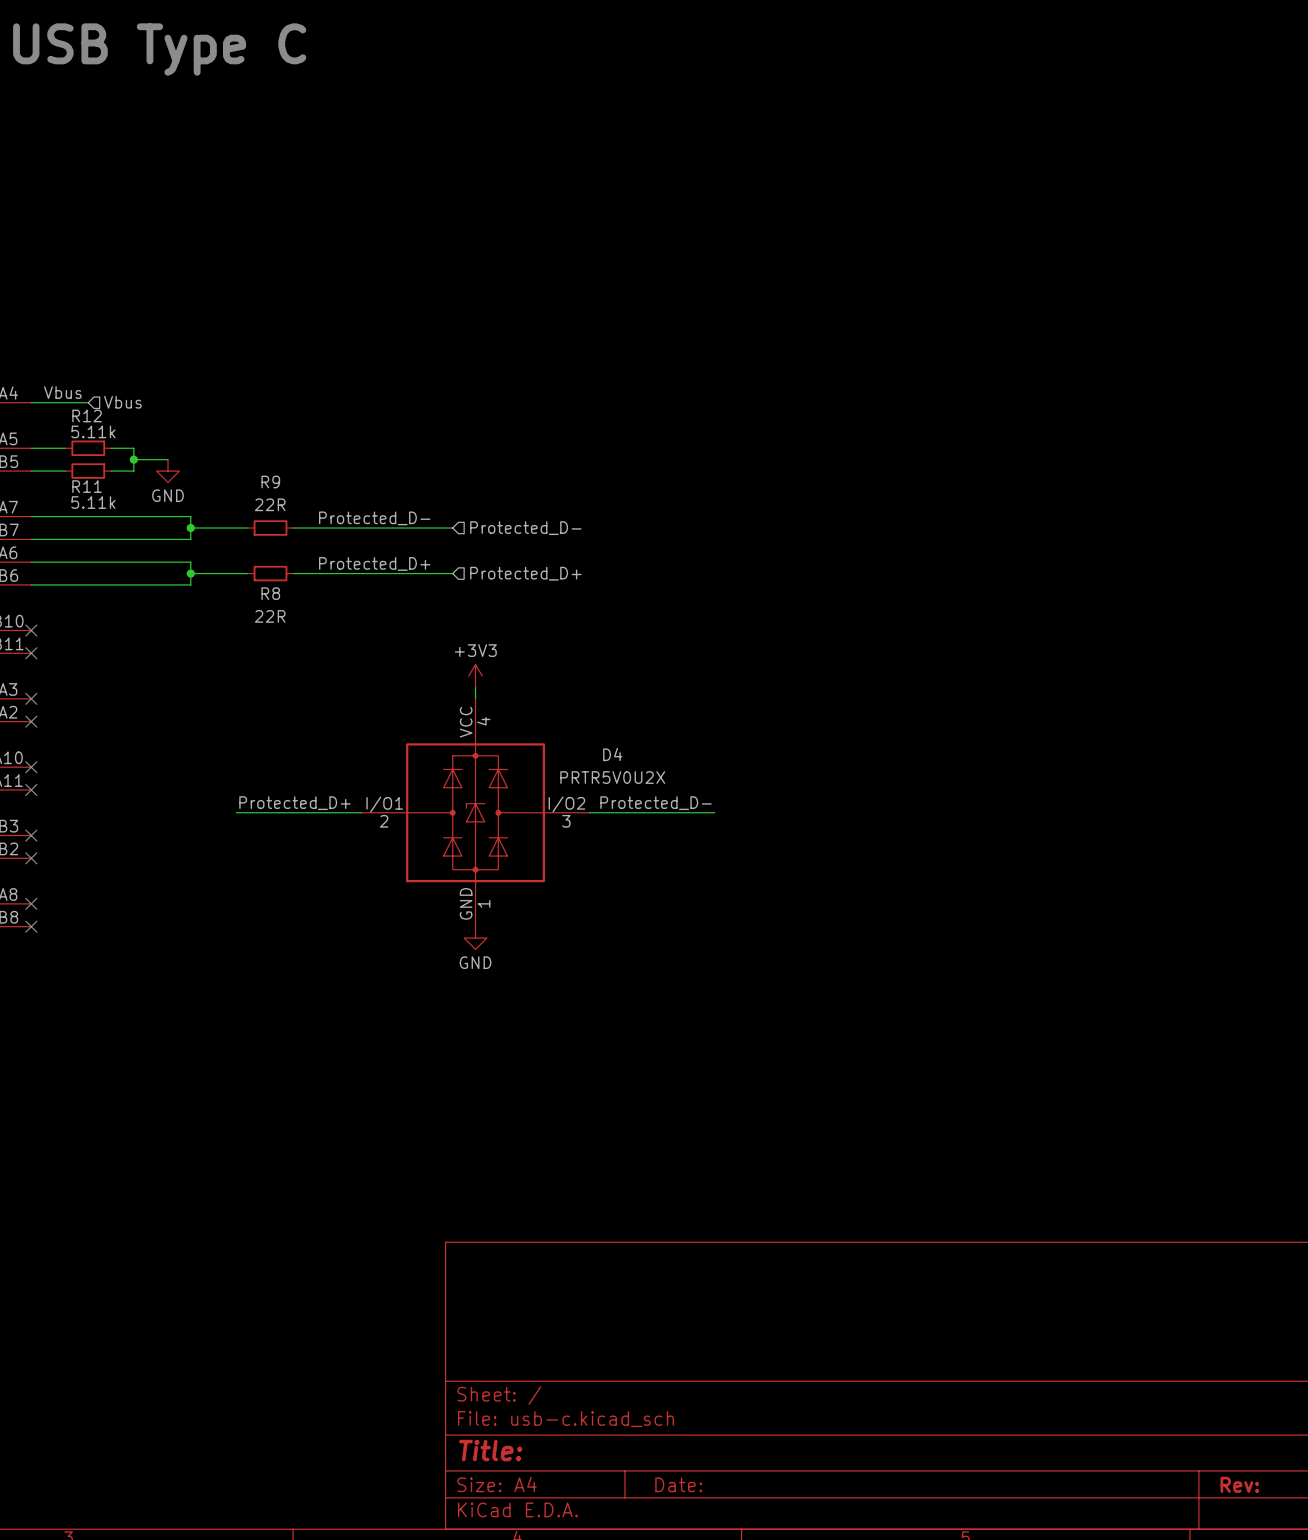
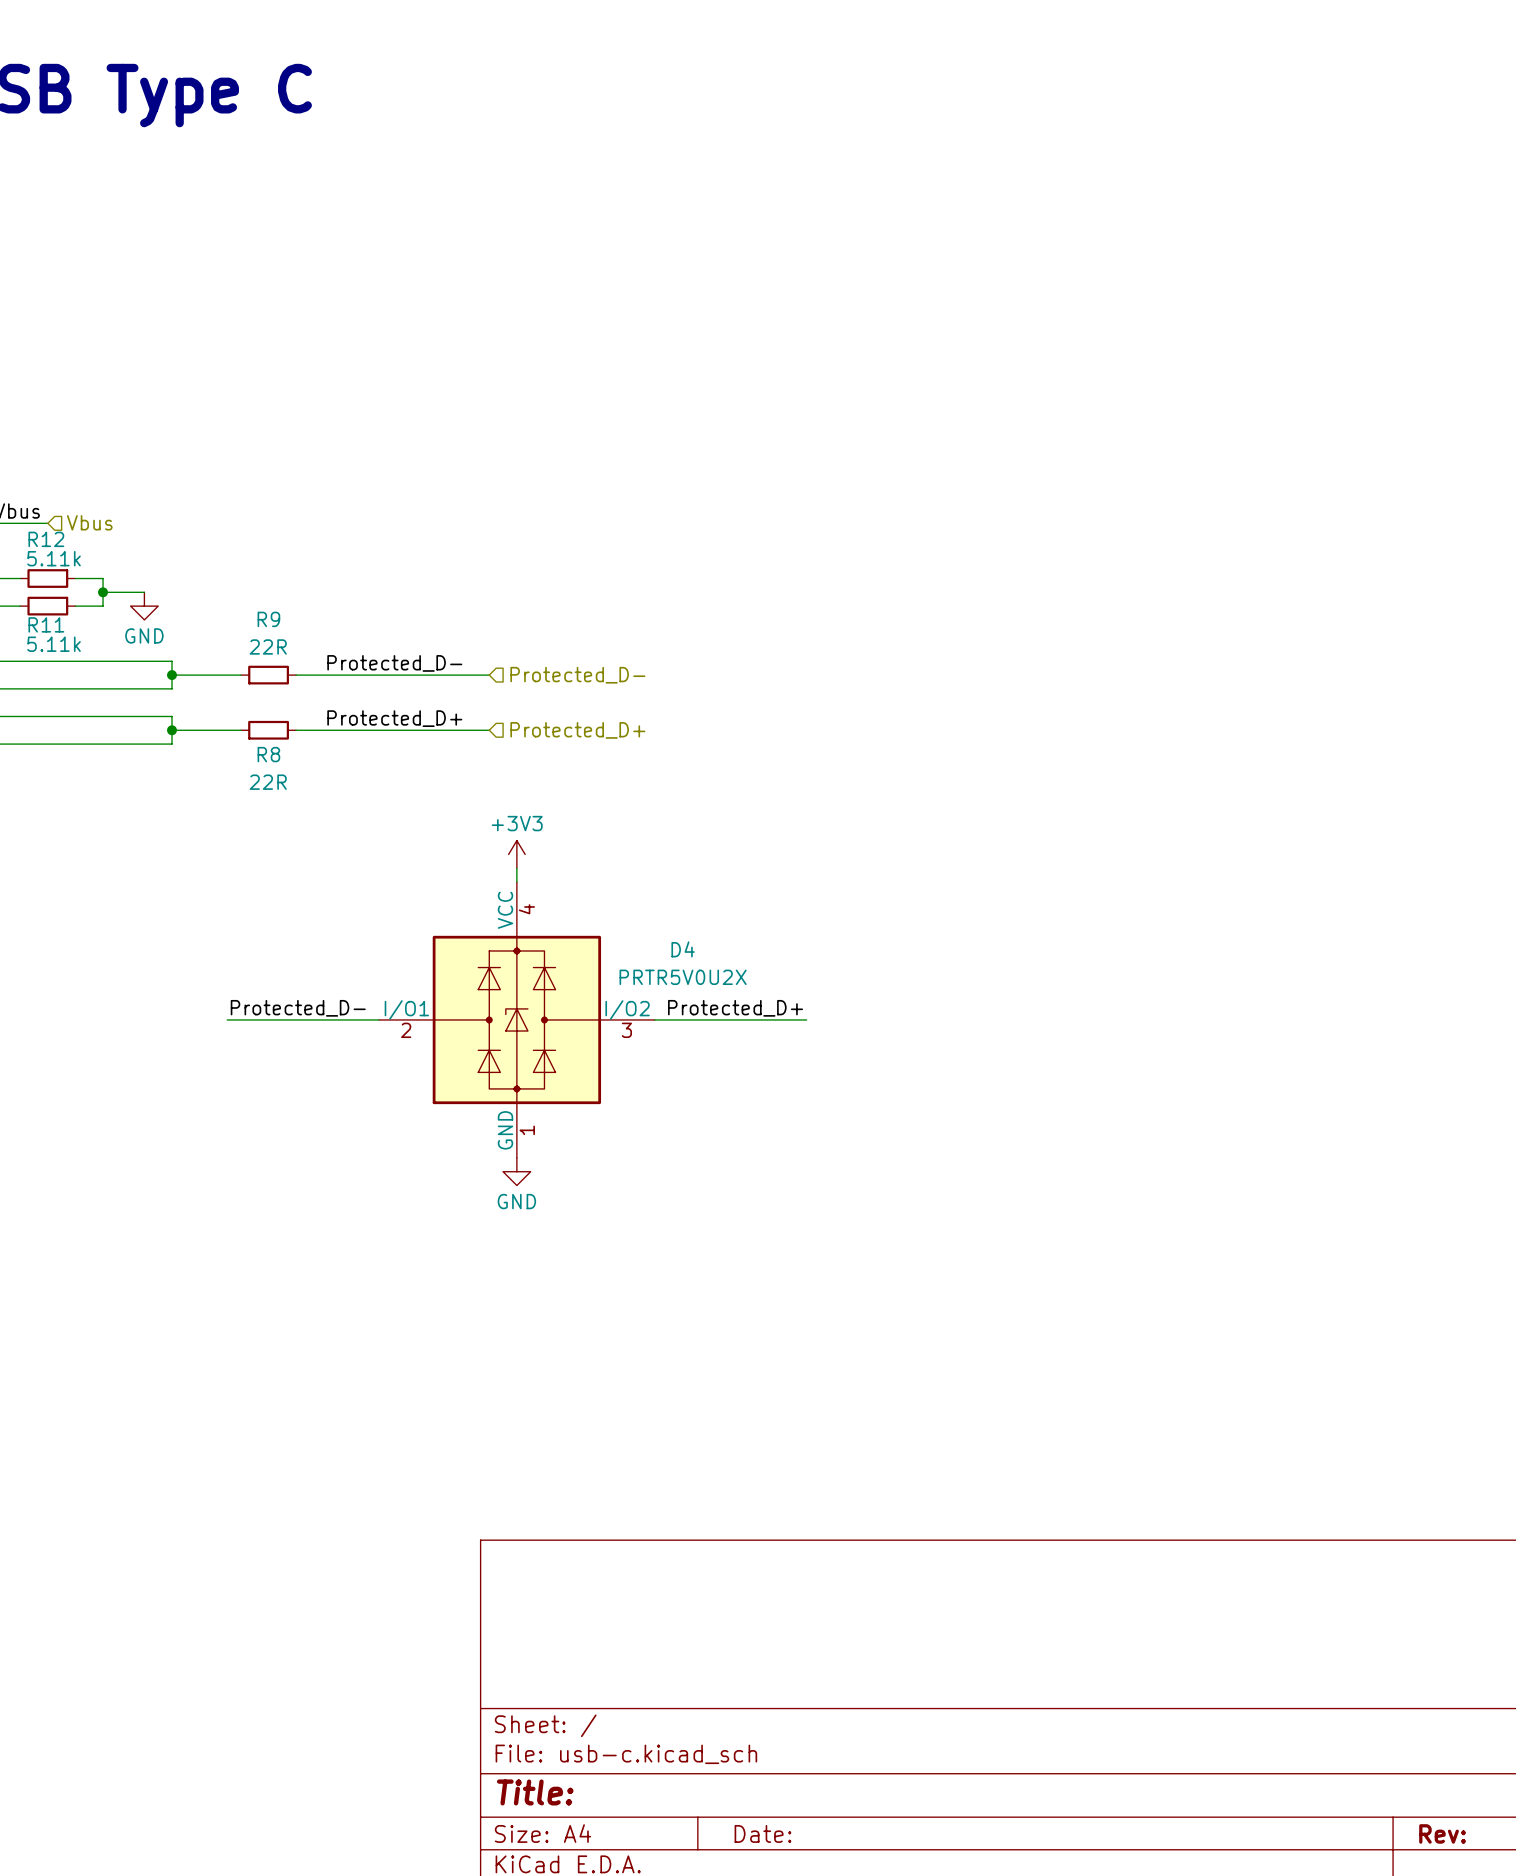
label: Protected_D+ (295, 803) -> Protected_D- (298, 1008)
label: Protected_D- (656, 803) -> Protected_D+ (735, 1008)

